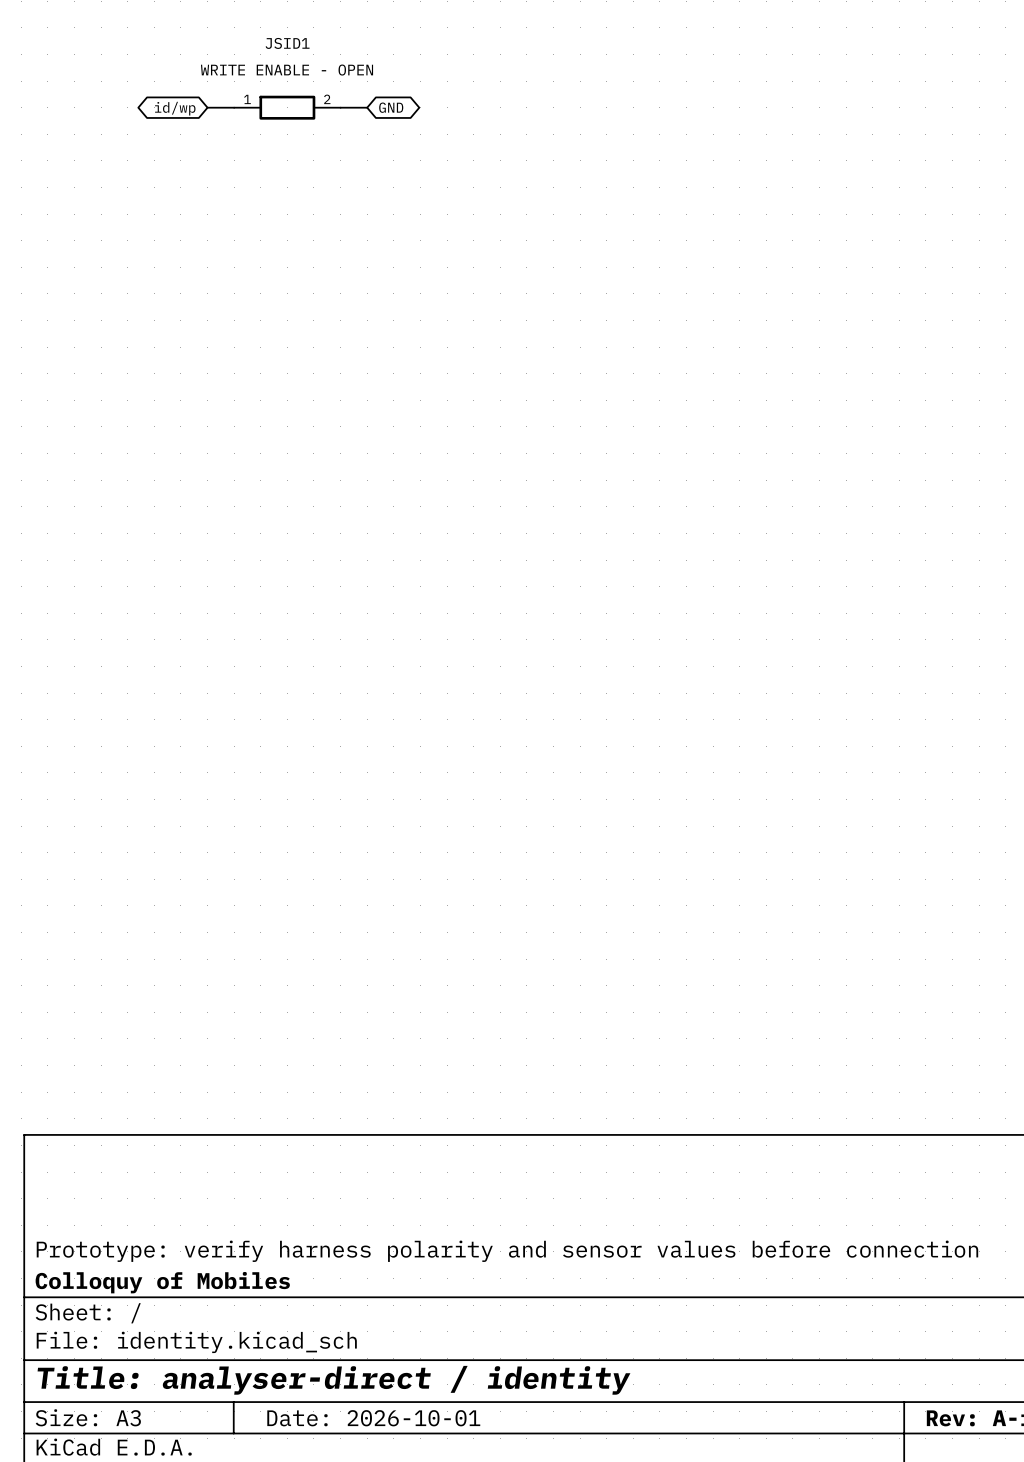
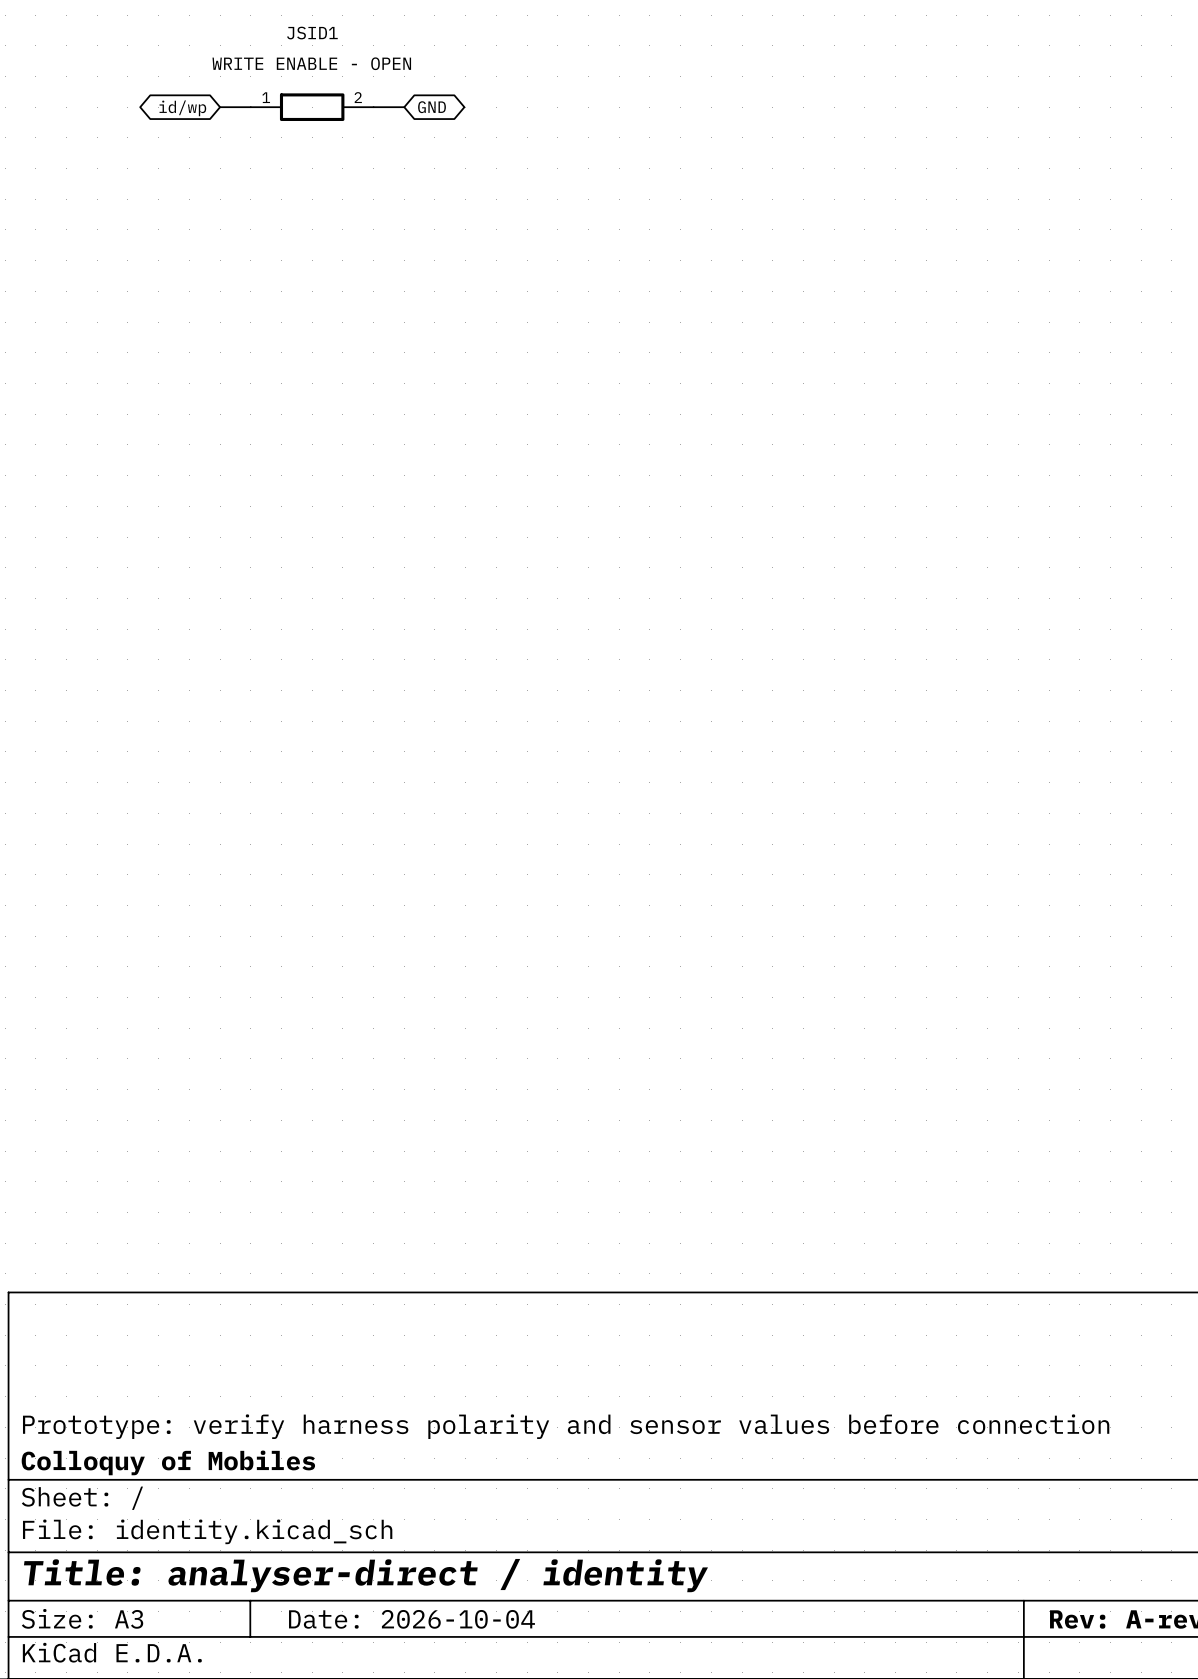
title block: Date: 2026-10-01 (373, 1418) -> Date: 2026-10-04 (411, 1619)

